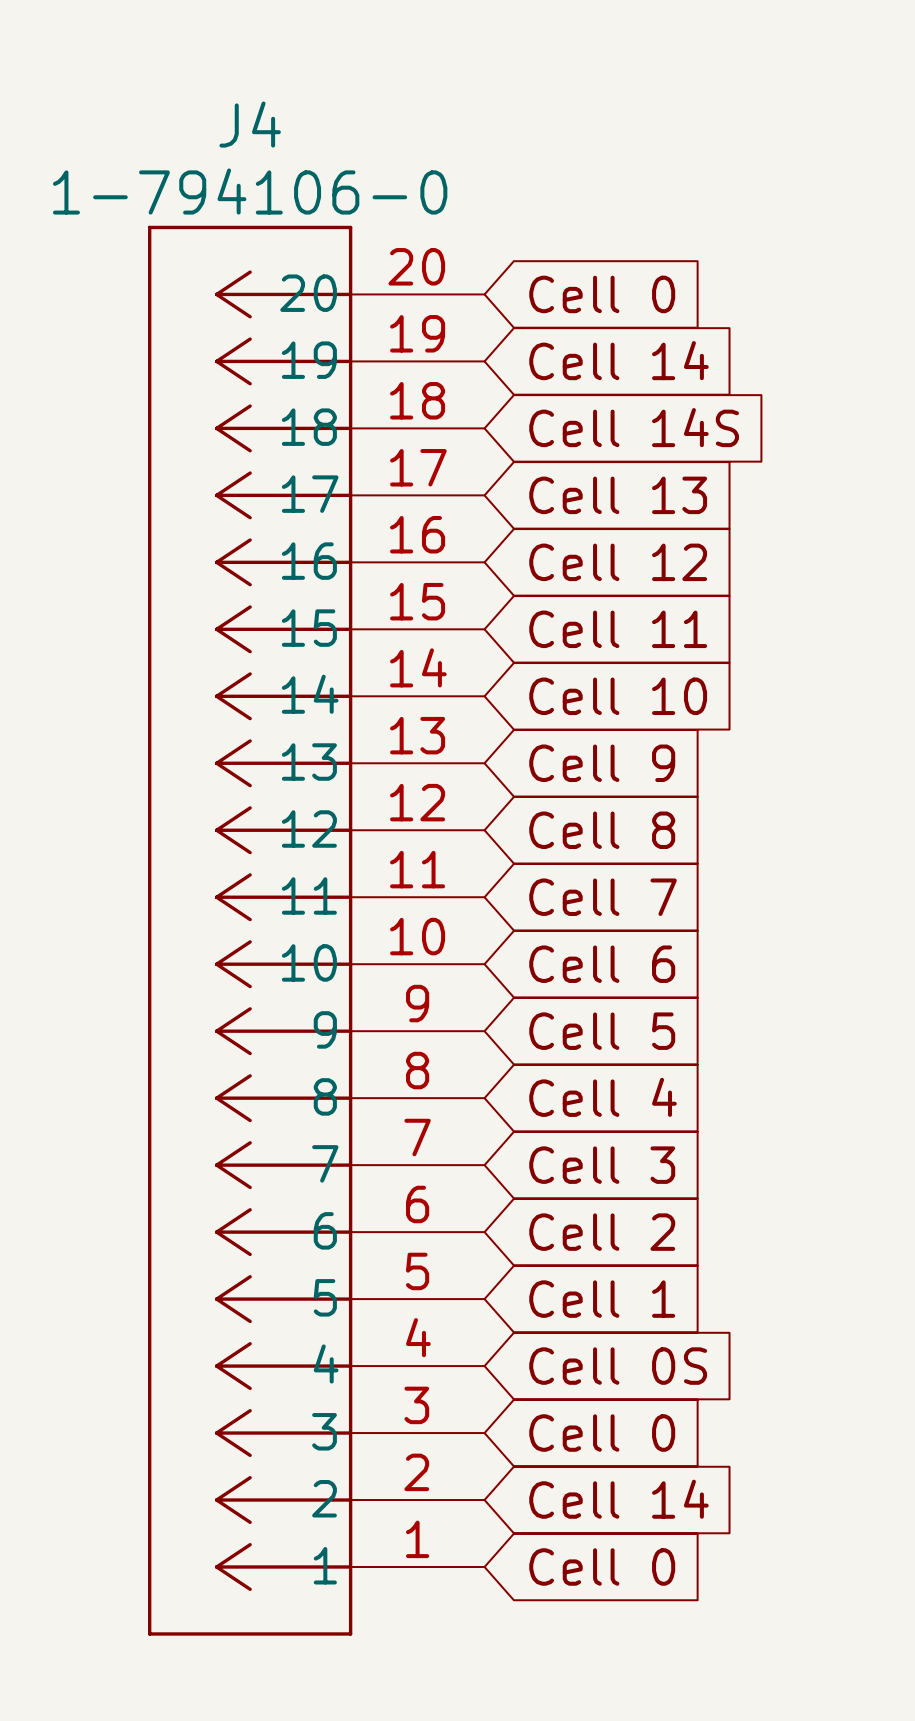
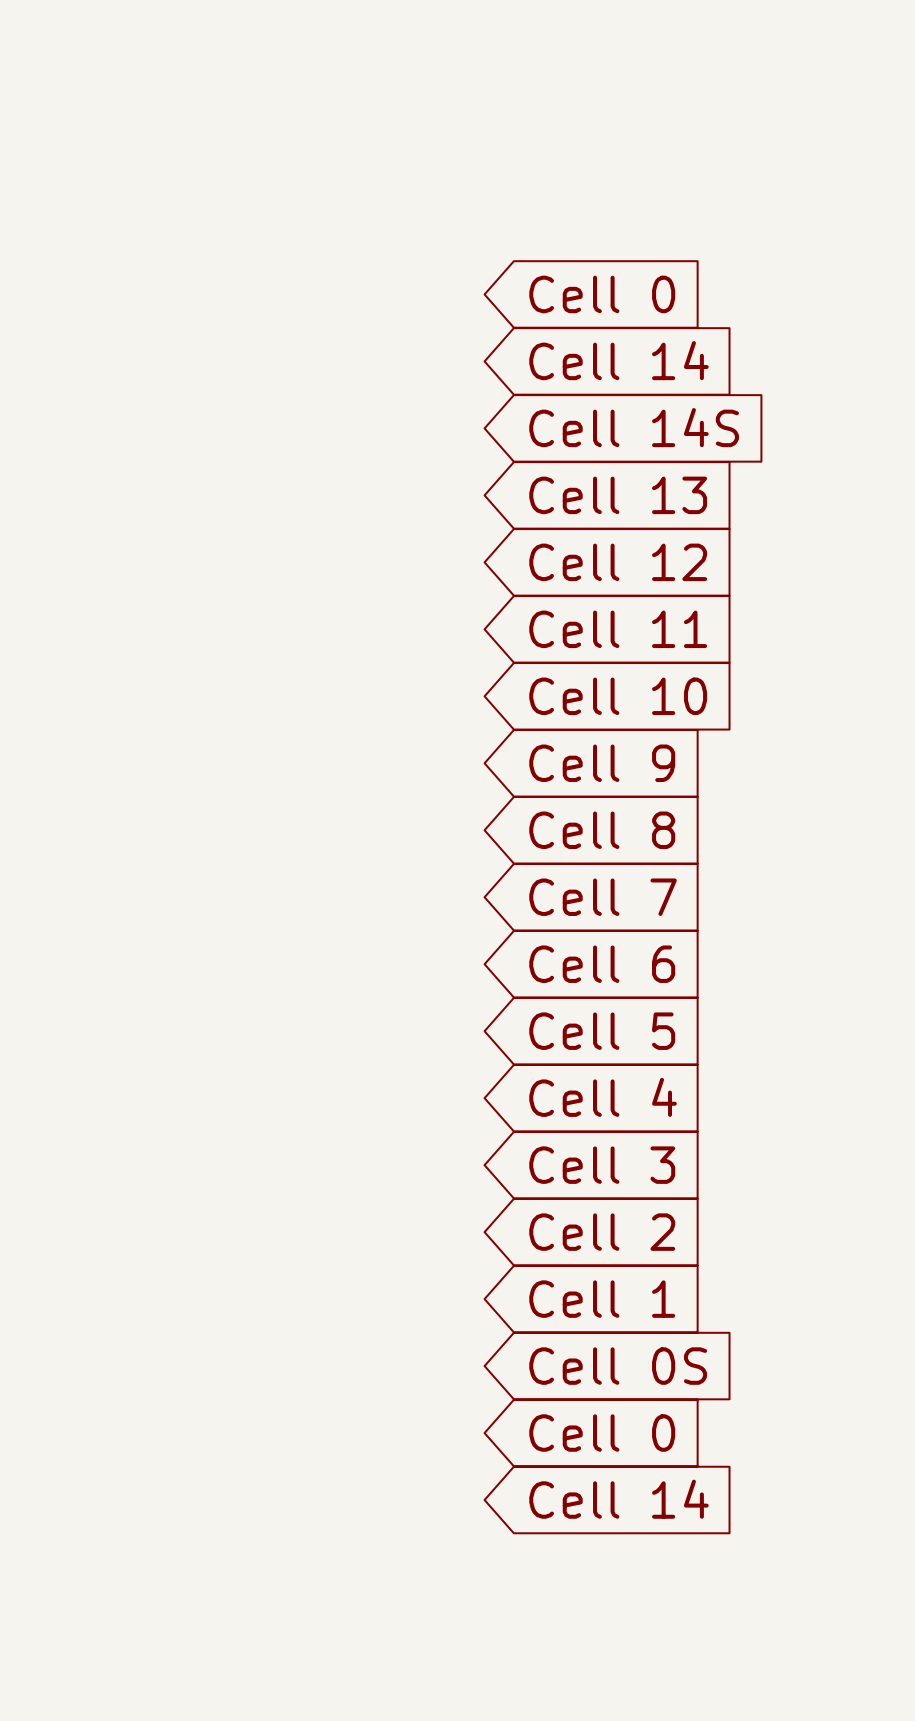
J4: 1-794106-0 (316, 930) -> none
global label: Cell 0 (602, 1566) -> none

